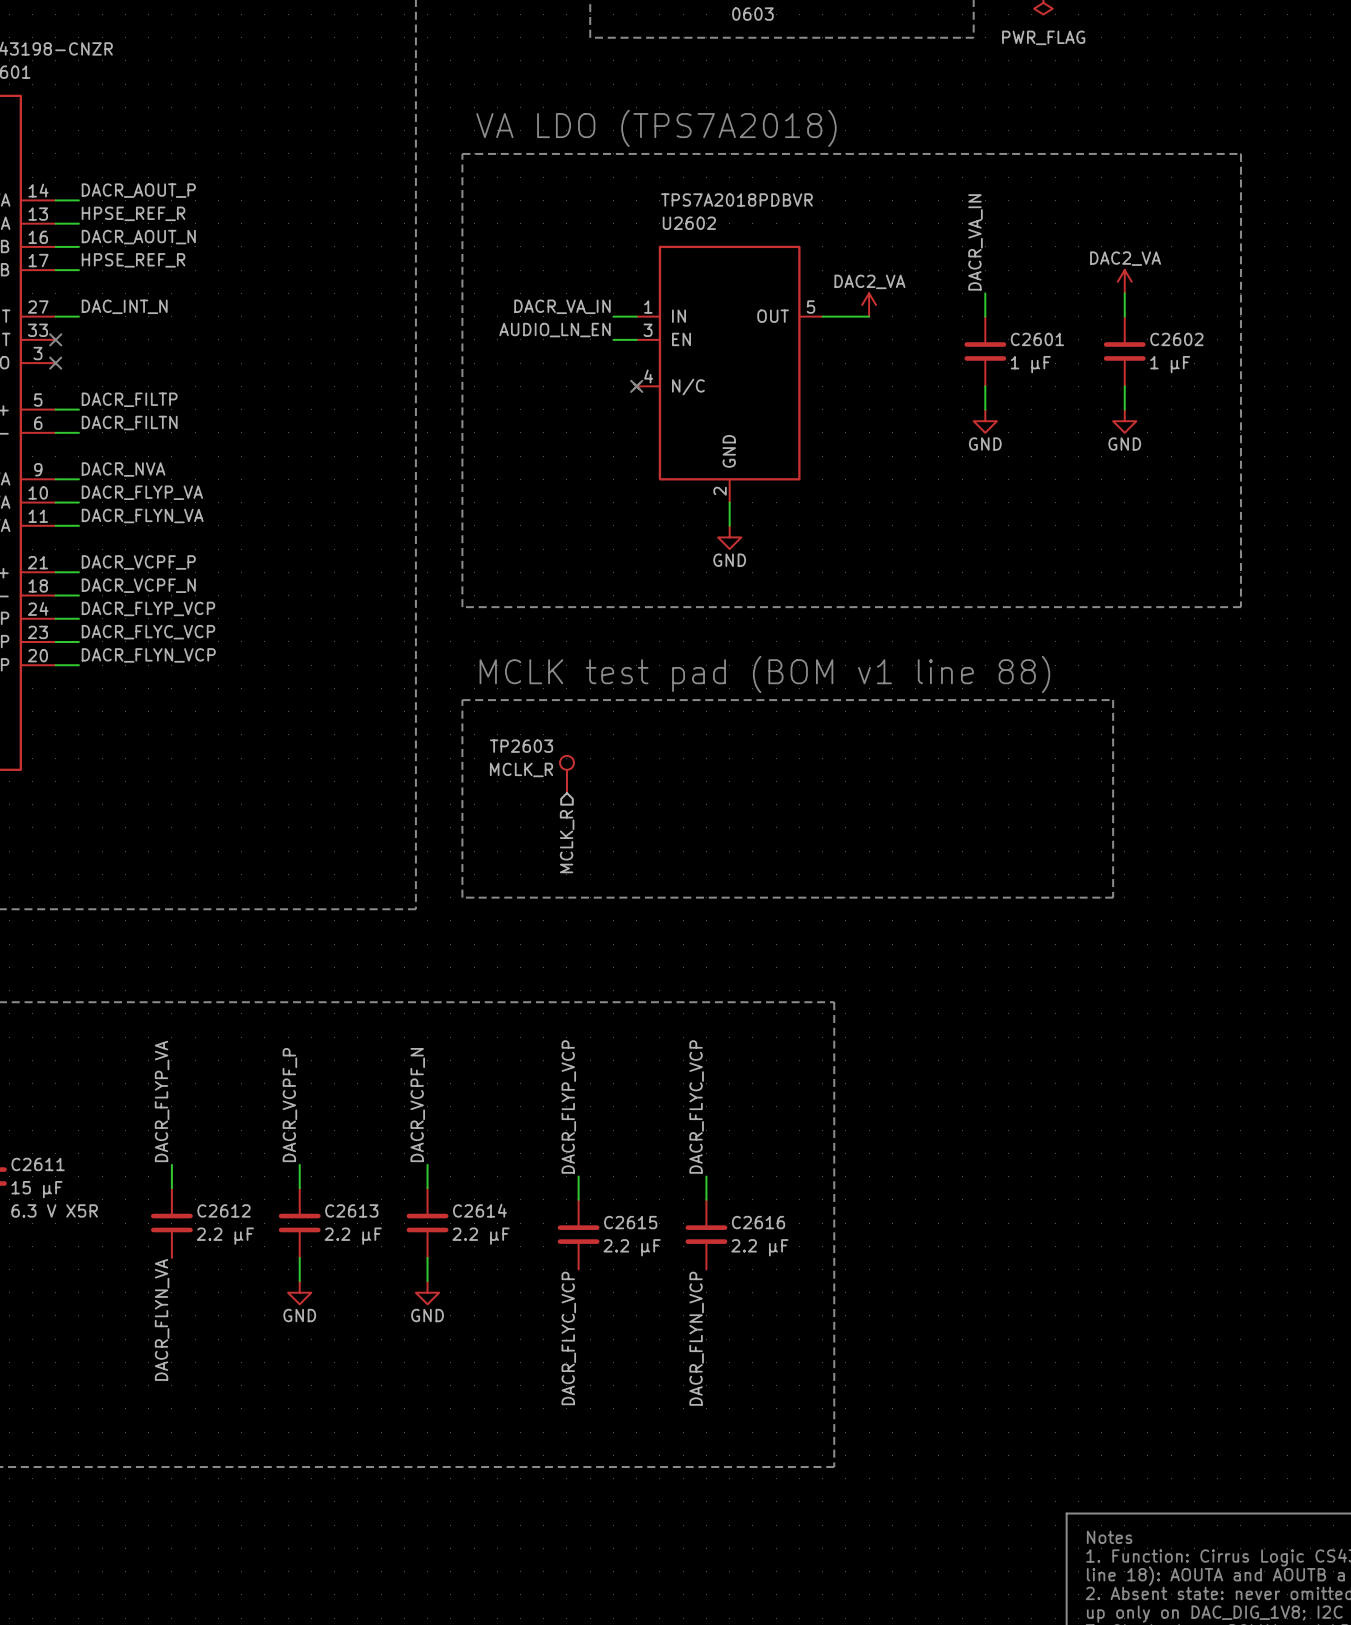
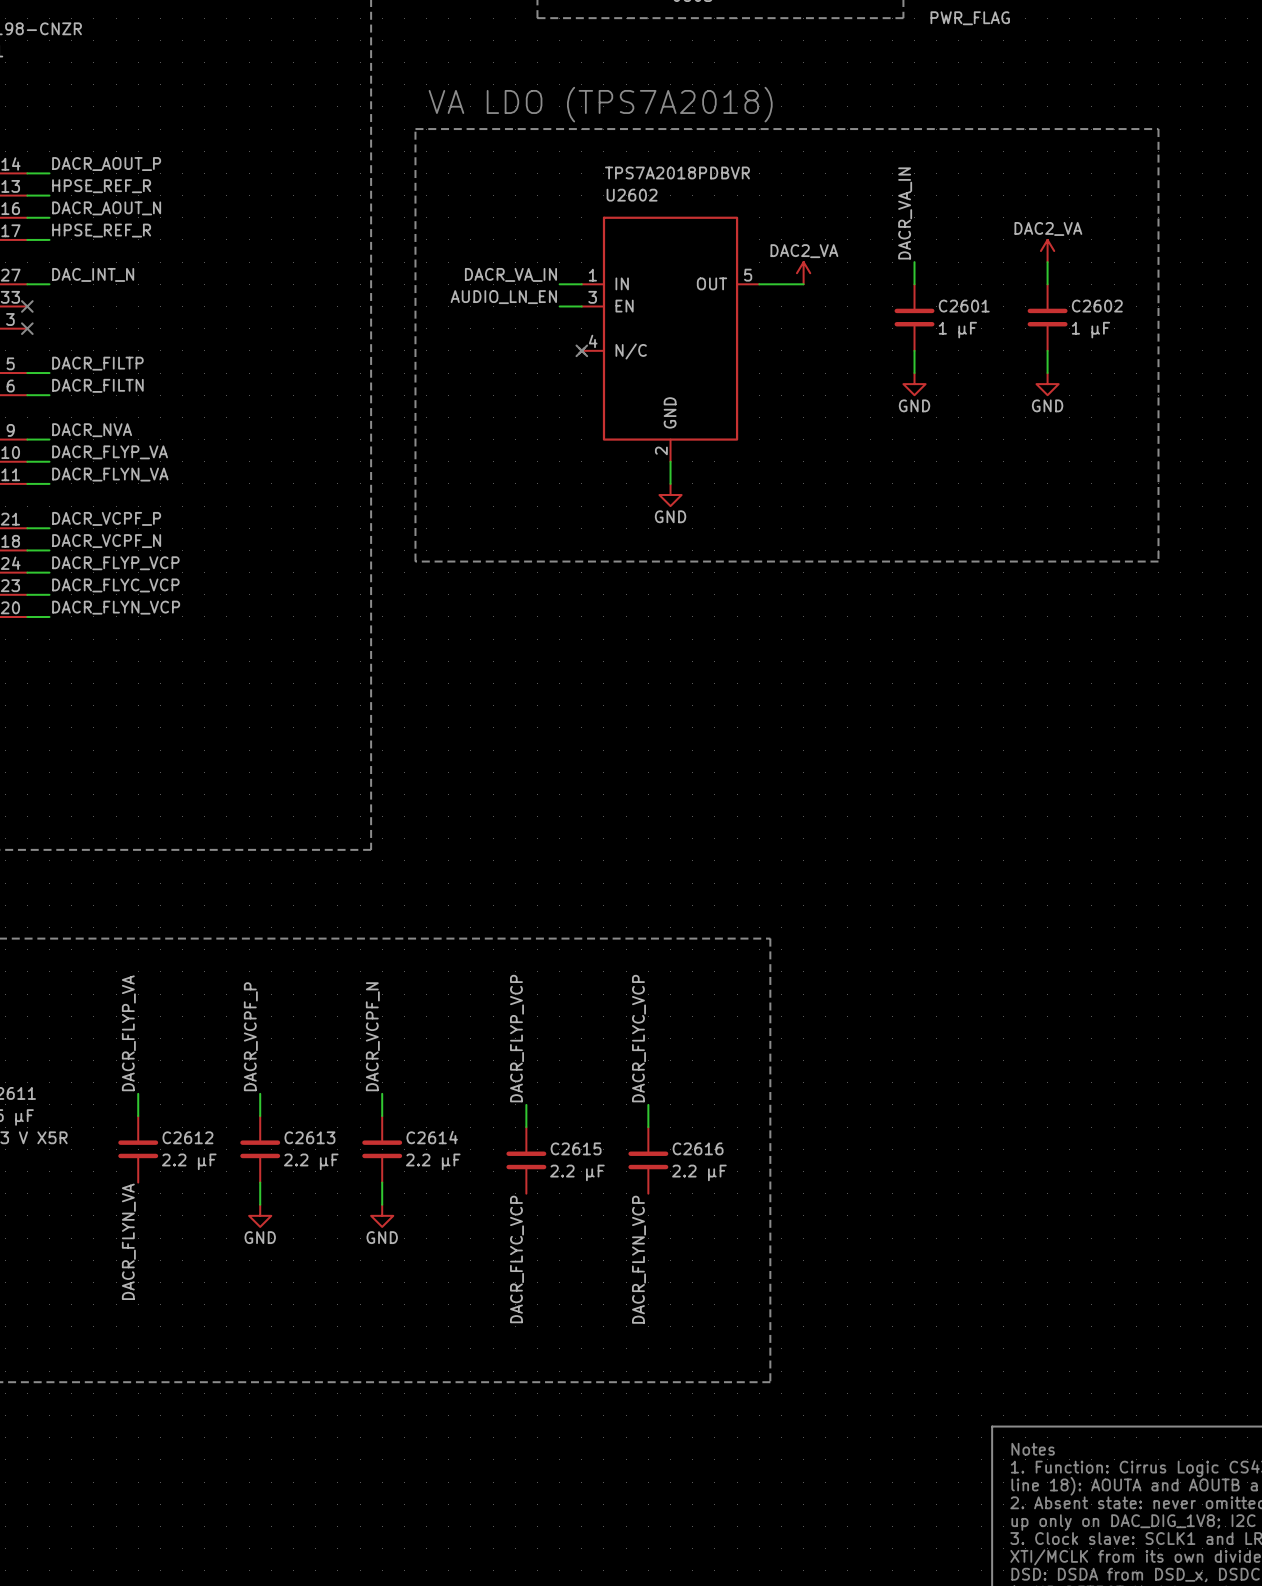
text: MCLK test pad (BOM v1 line 88) (764, 674) -> none
line: (462, 700) (1113, 700) (1113, 897) (462, 897) (462, 700) -> none
TP2603: MCLK_R (566, 774) -> none
hierarchical label: MCLK_R (567, 841) -> none

